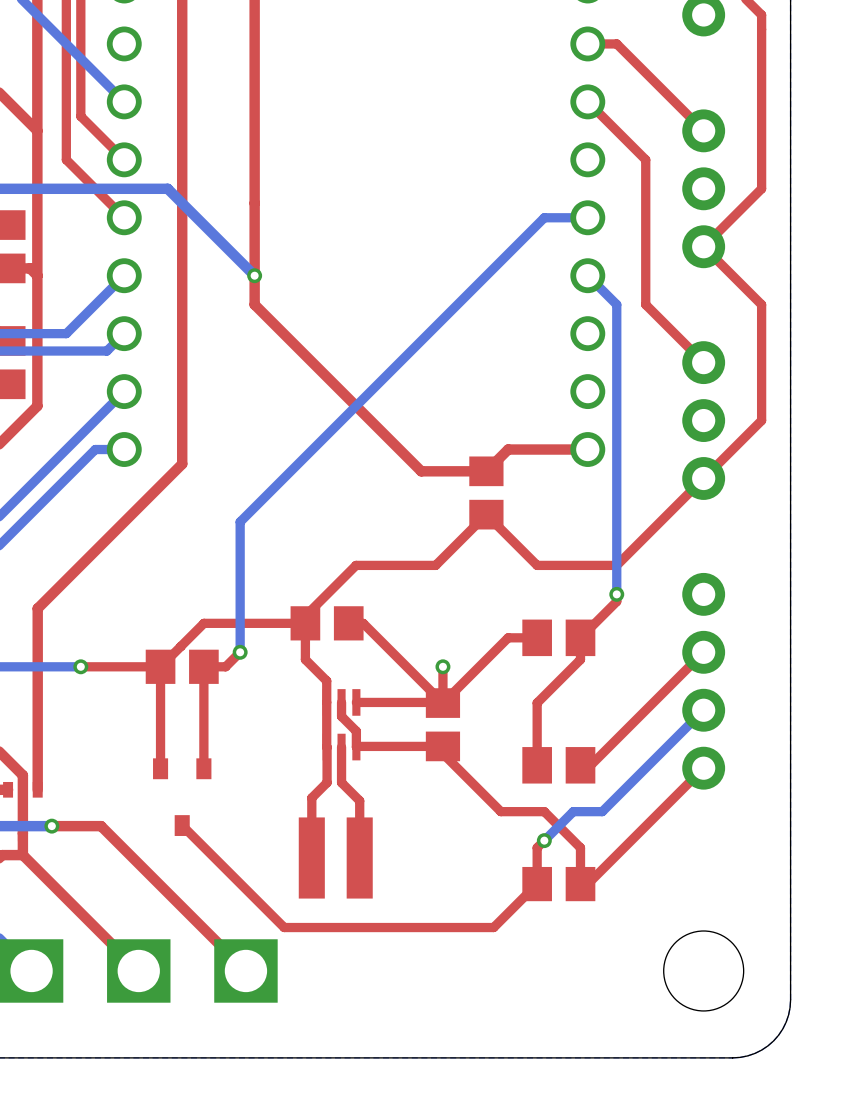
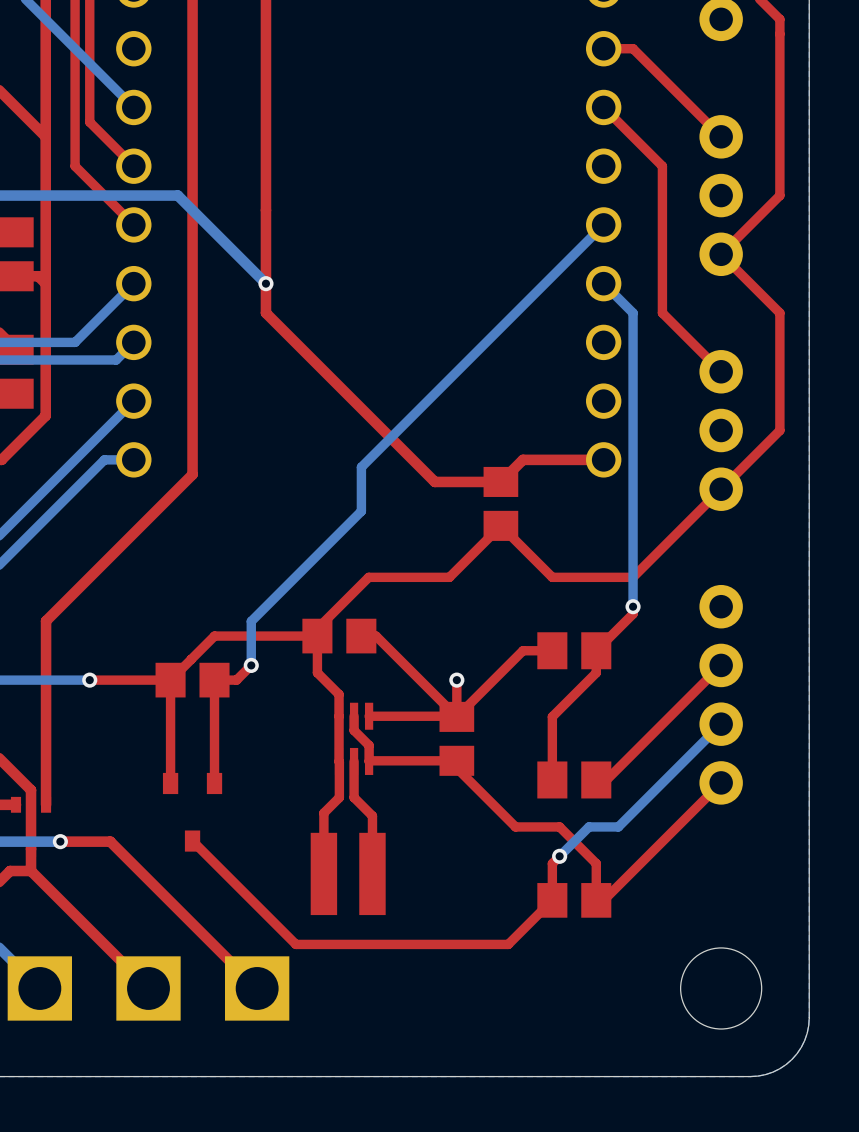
bottom track: (587, 217) (544, 217) (240, 521) (240, 608) -> (603, 224) (361, 467) (361, 511) (251, 621)

